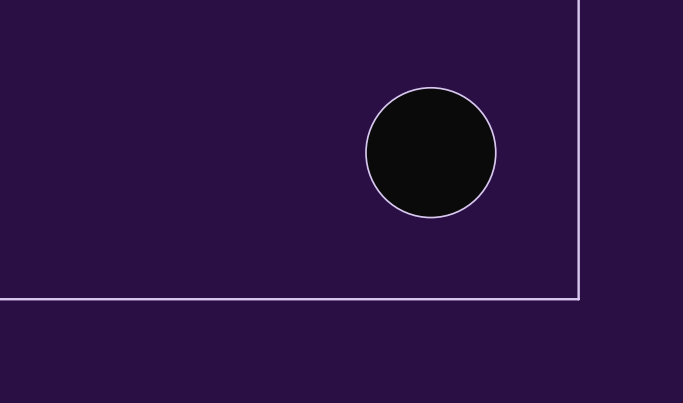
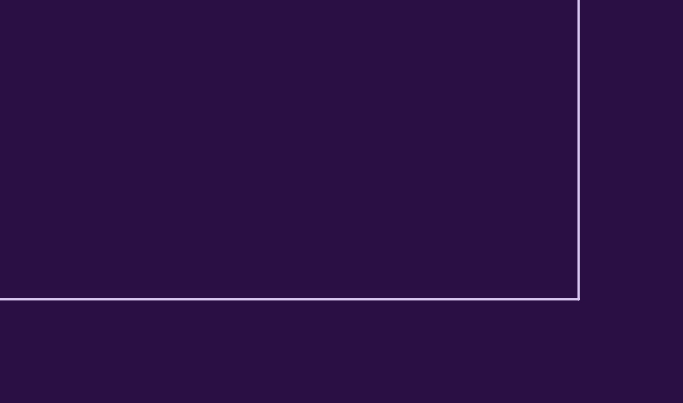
part: (430, 152) -> none

